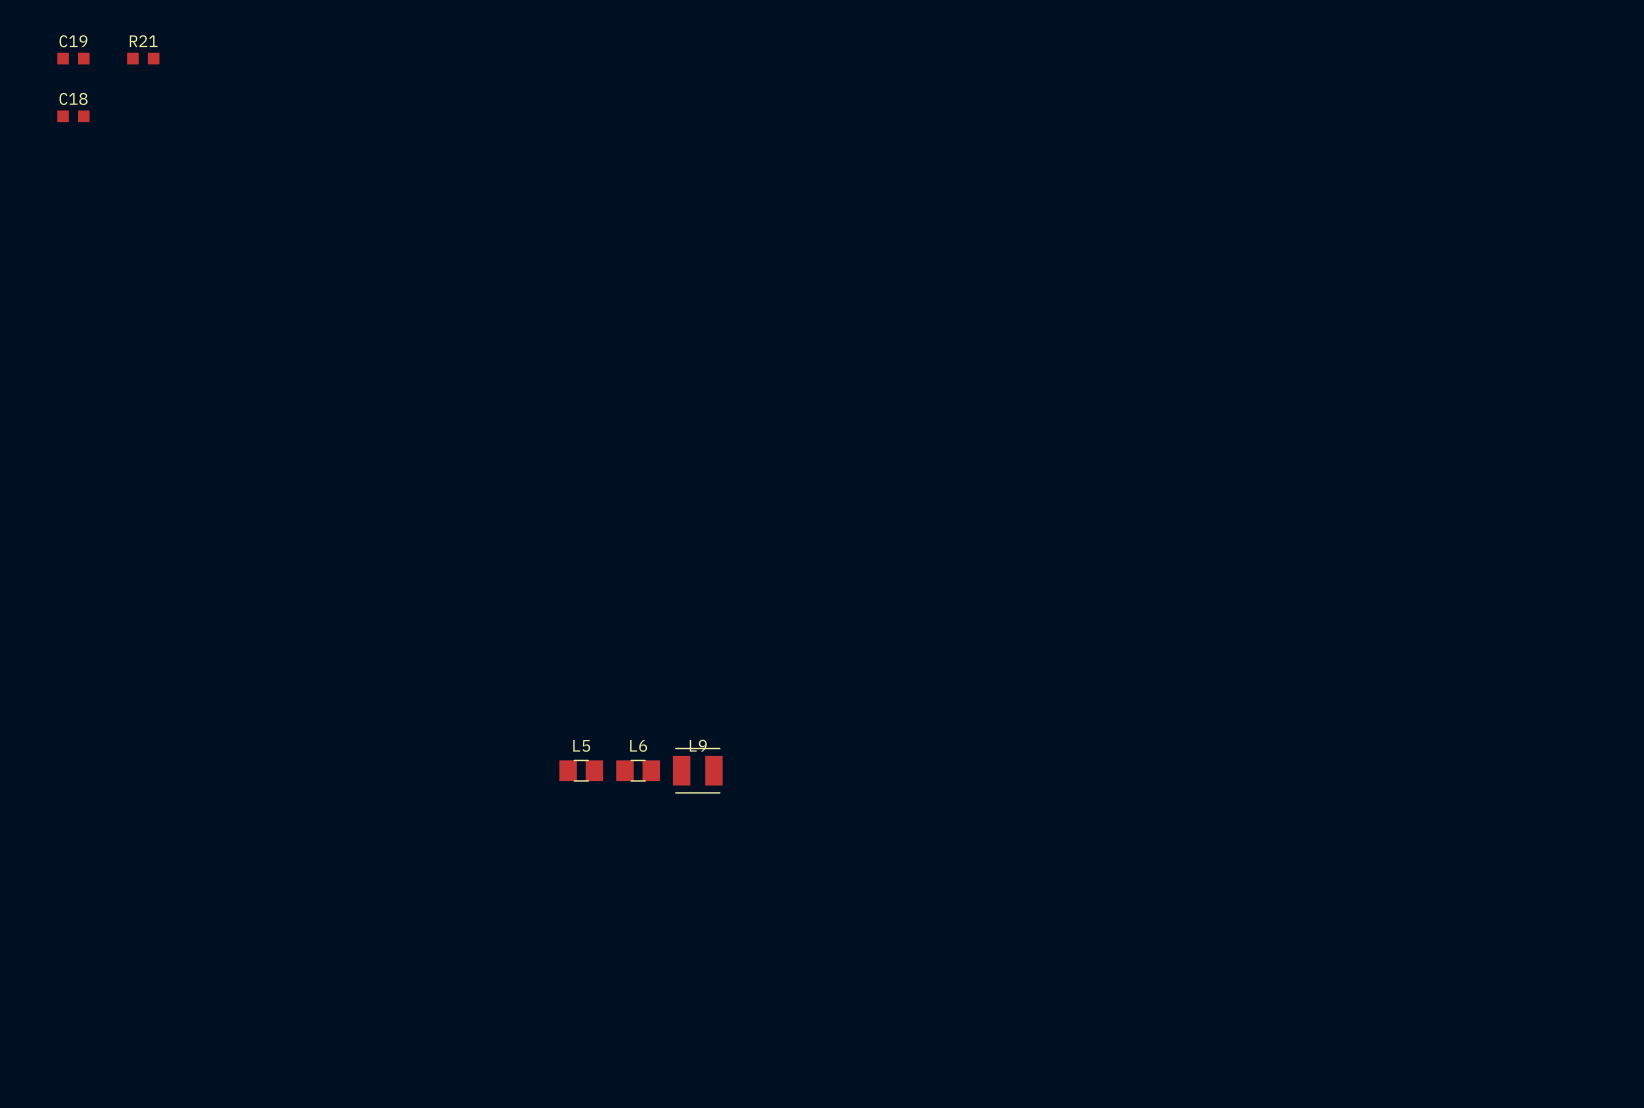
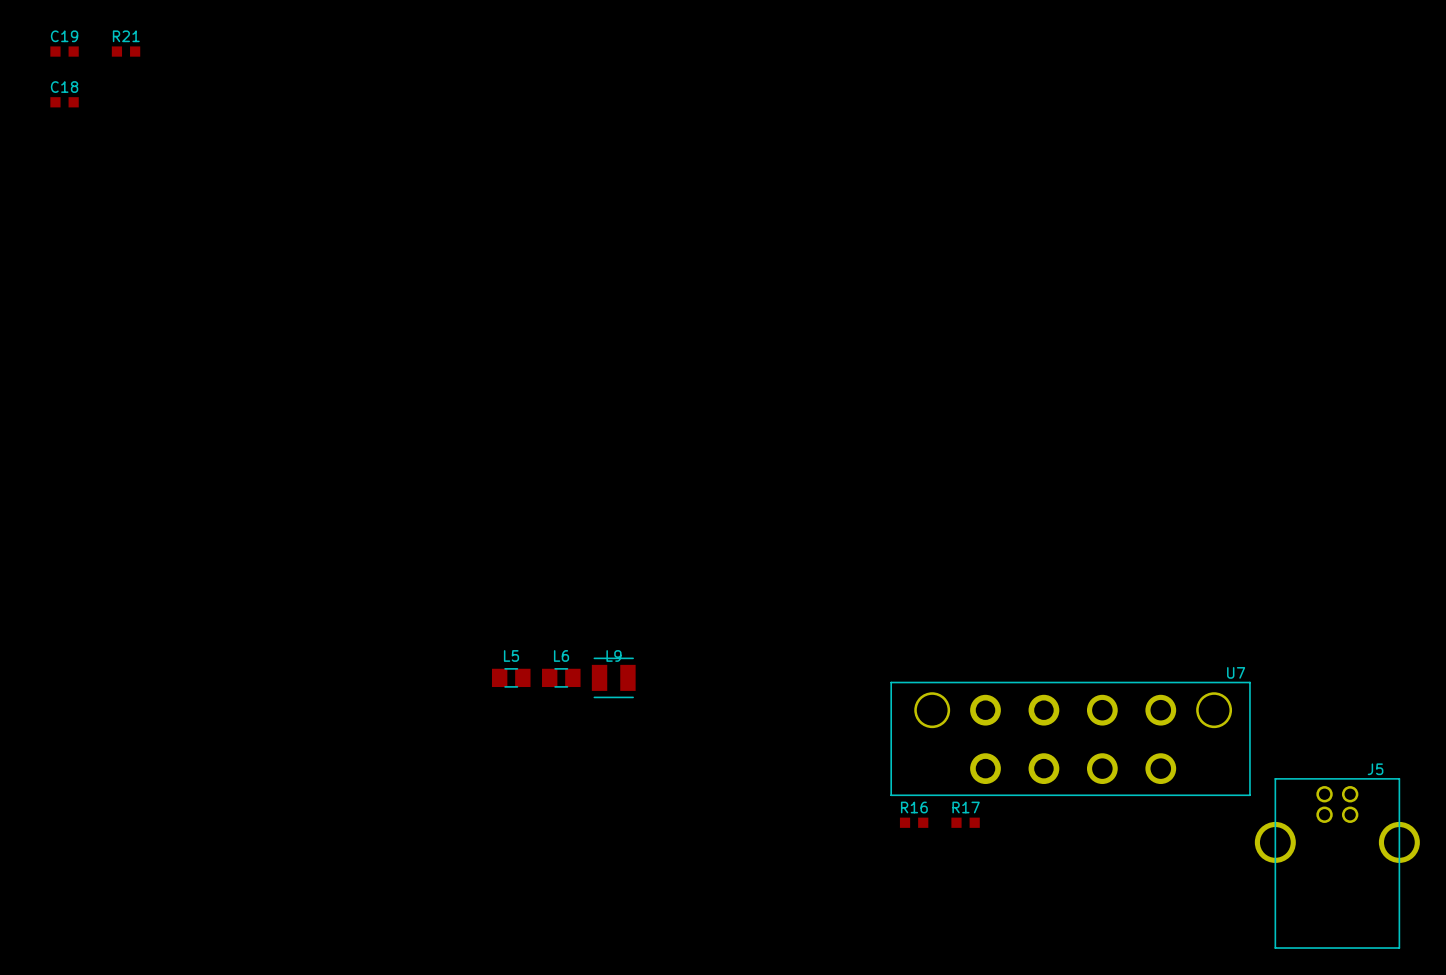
U7: none -> (1070, 738)
R16: none -> (914, 822)
R17: none -> (965, 822)
J5: none -> (1337, 863)

